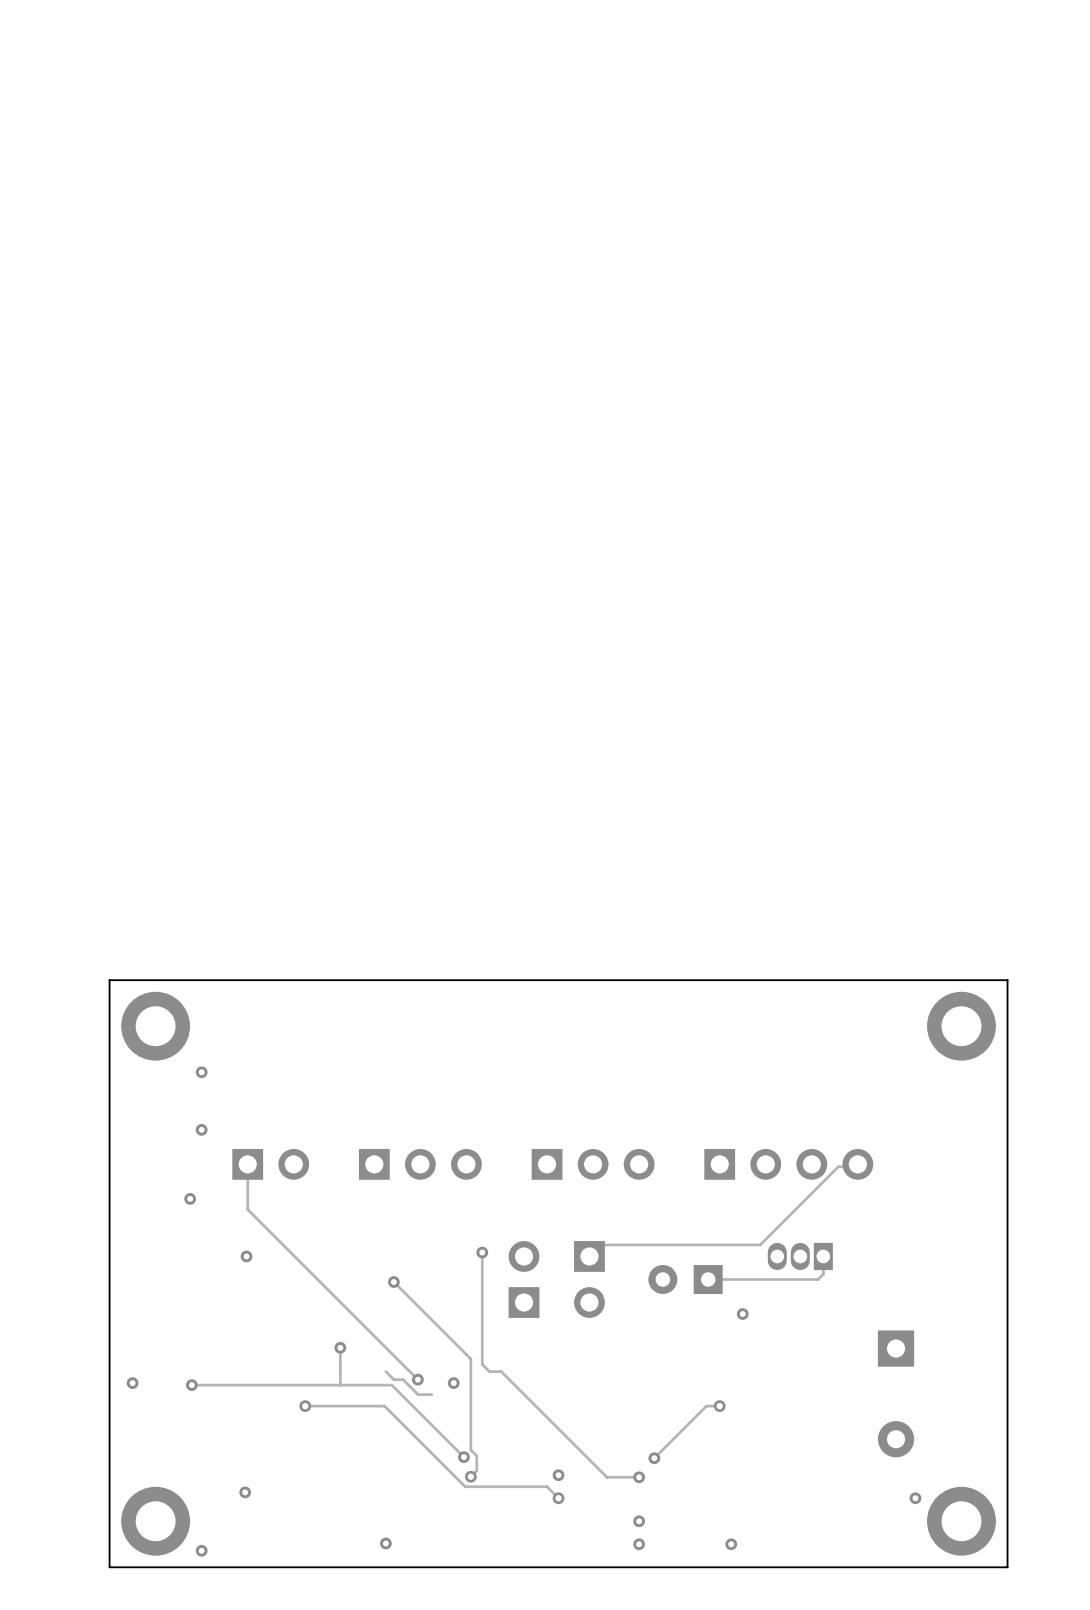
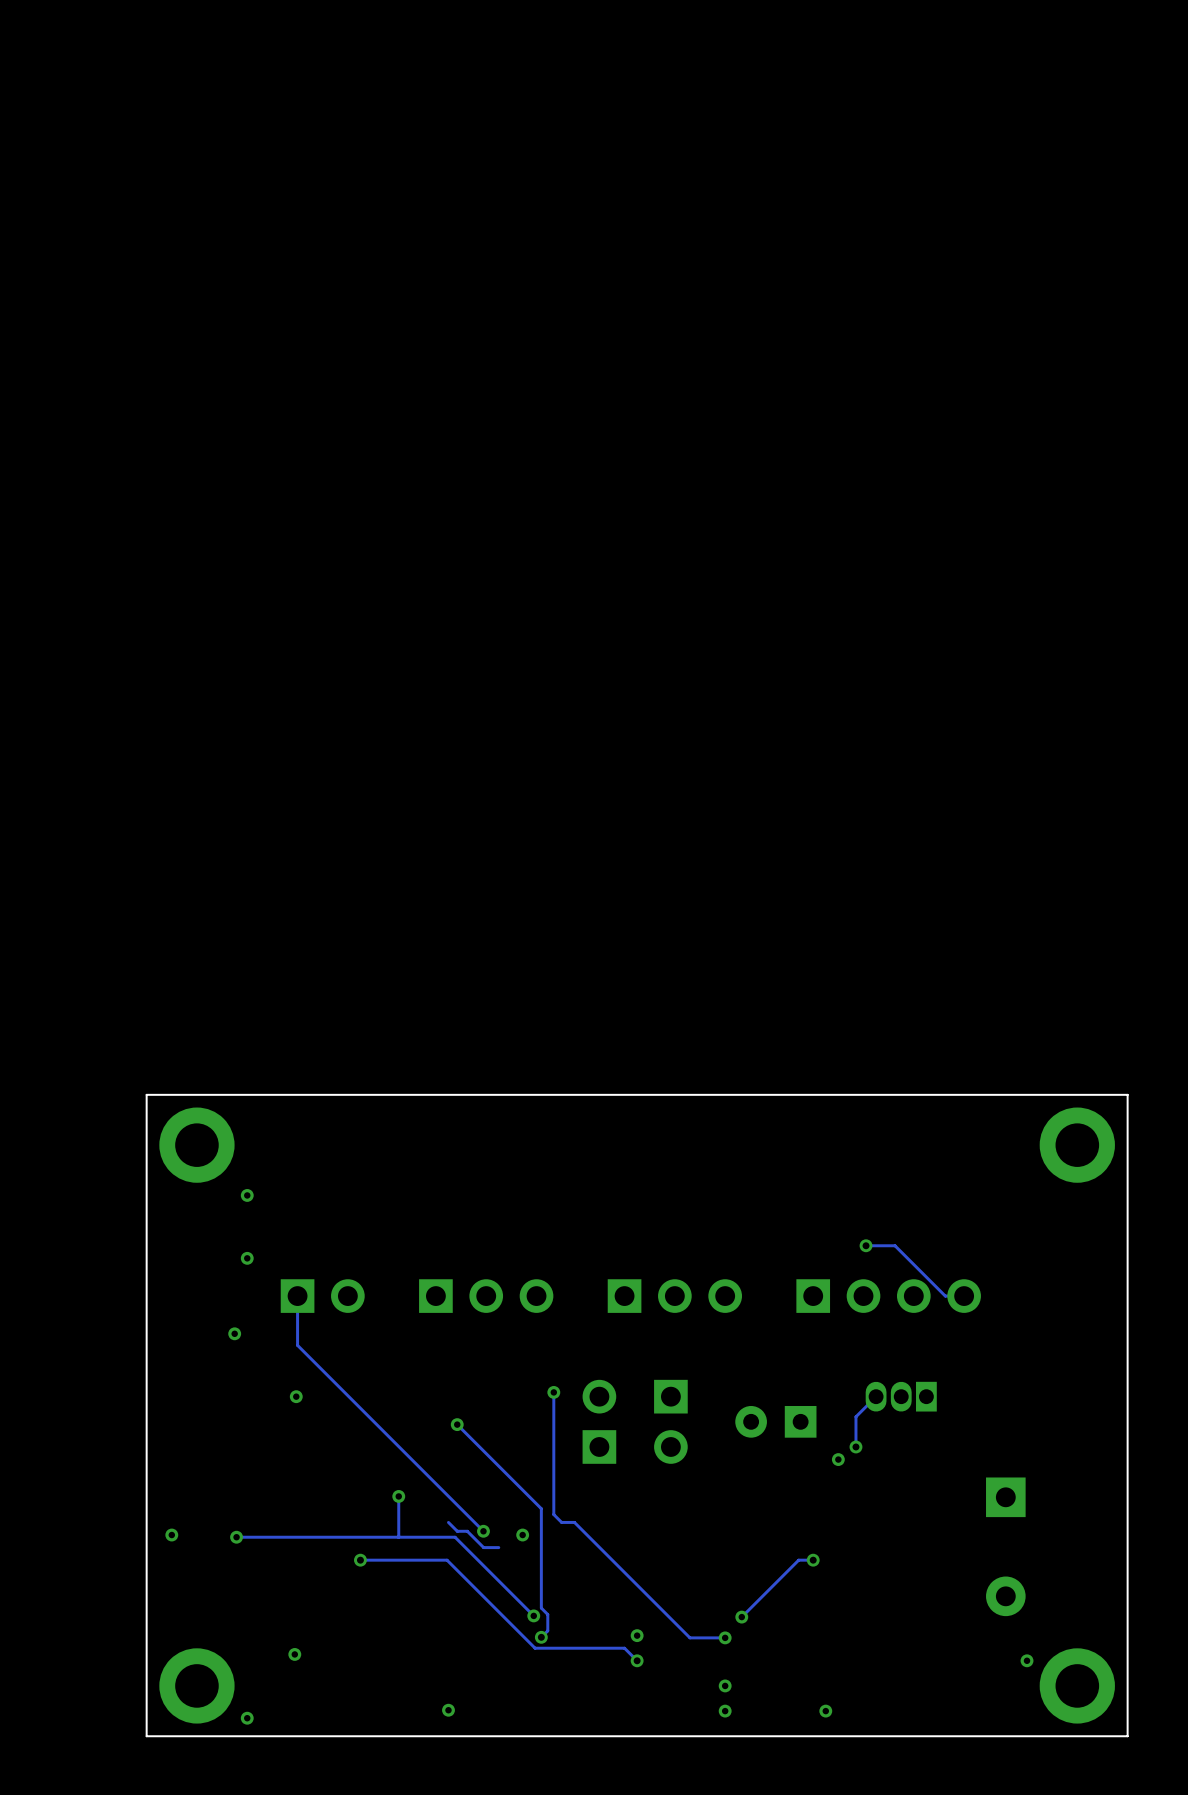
track: none -> (866, 1245) (895, 1245) (945, 1296) (964, 1296)
via: none -> (866, 1245)
track: (855, 1166) (838, 1166) (760, 1244) (600, 1244) -> none
track: none -> (876, 1396) (855, 1416) (855, 1446)
track: (823, 1256) (823, 1274) (817, 1279) (708, 1279) -> none
via: none -> (855, 1446)

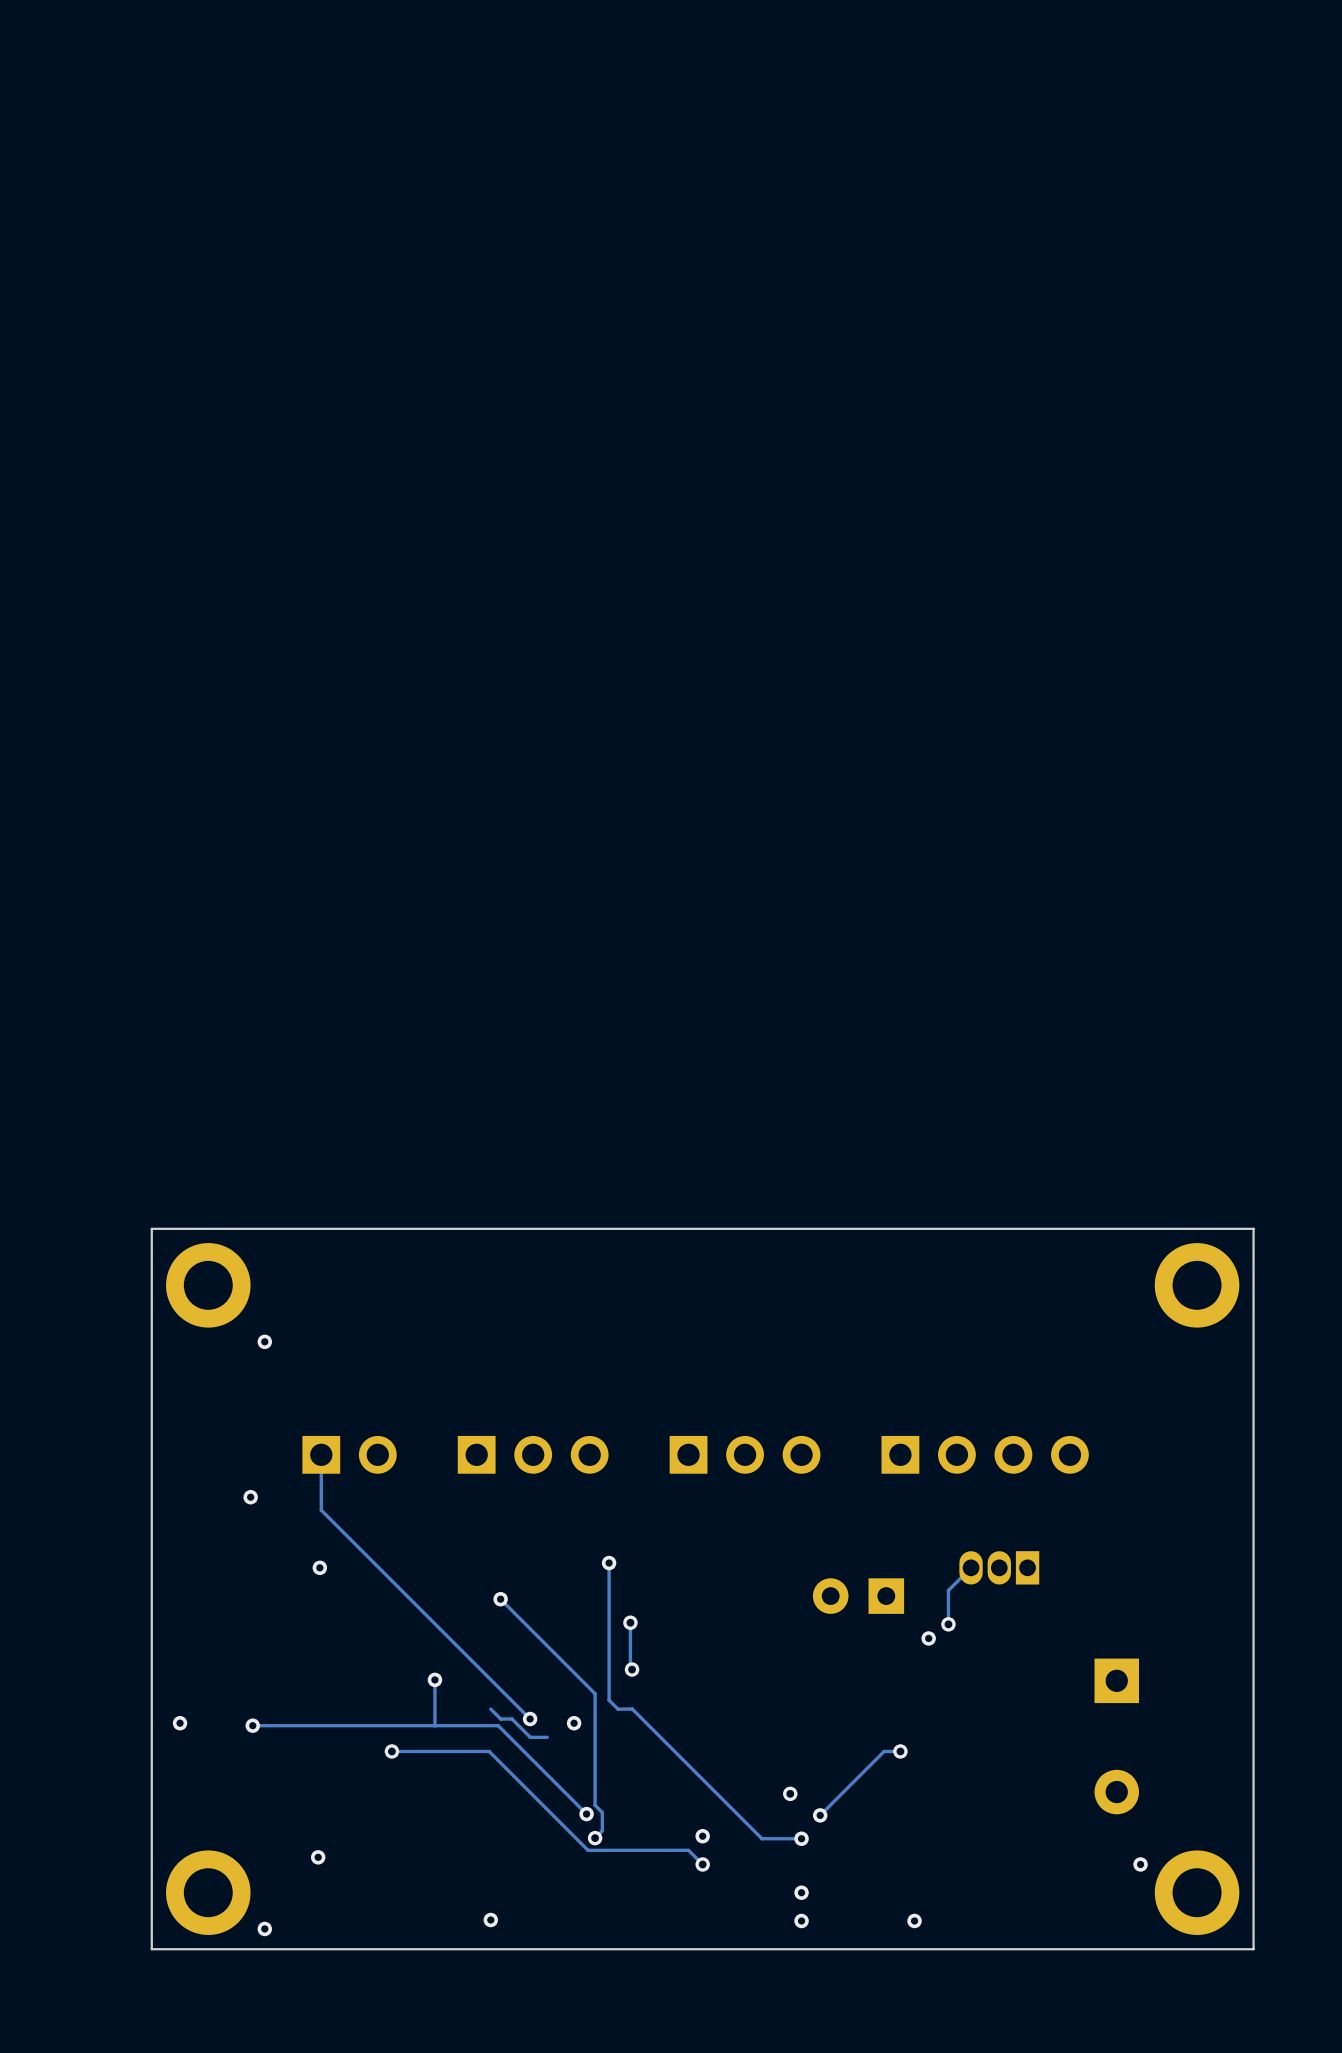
track: (866, 1245) (895, 1245) (945, 1296) (964, 1296) -> none
via: (866, 1245) -> none
via: (247, 1258) -> none
part: (599, 1421) -> none
part: (670, 1421) -> none
track: none -> (630, 1622) (630, 1667)
via: none -> (630, 1622)
via: none -> (632, 1669)
via: none -> (790, 1793)

